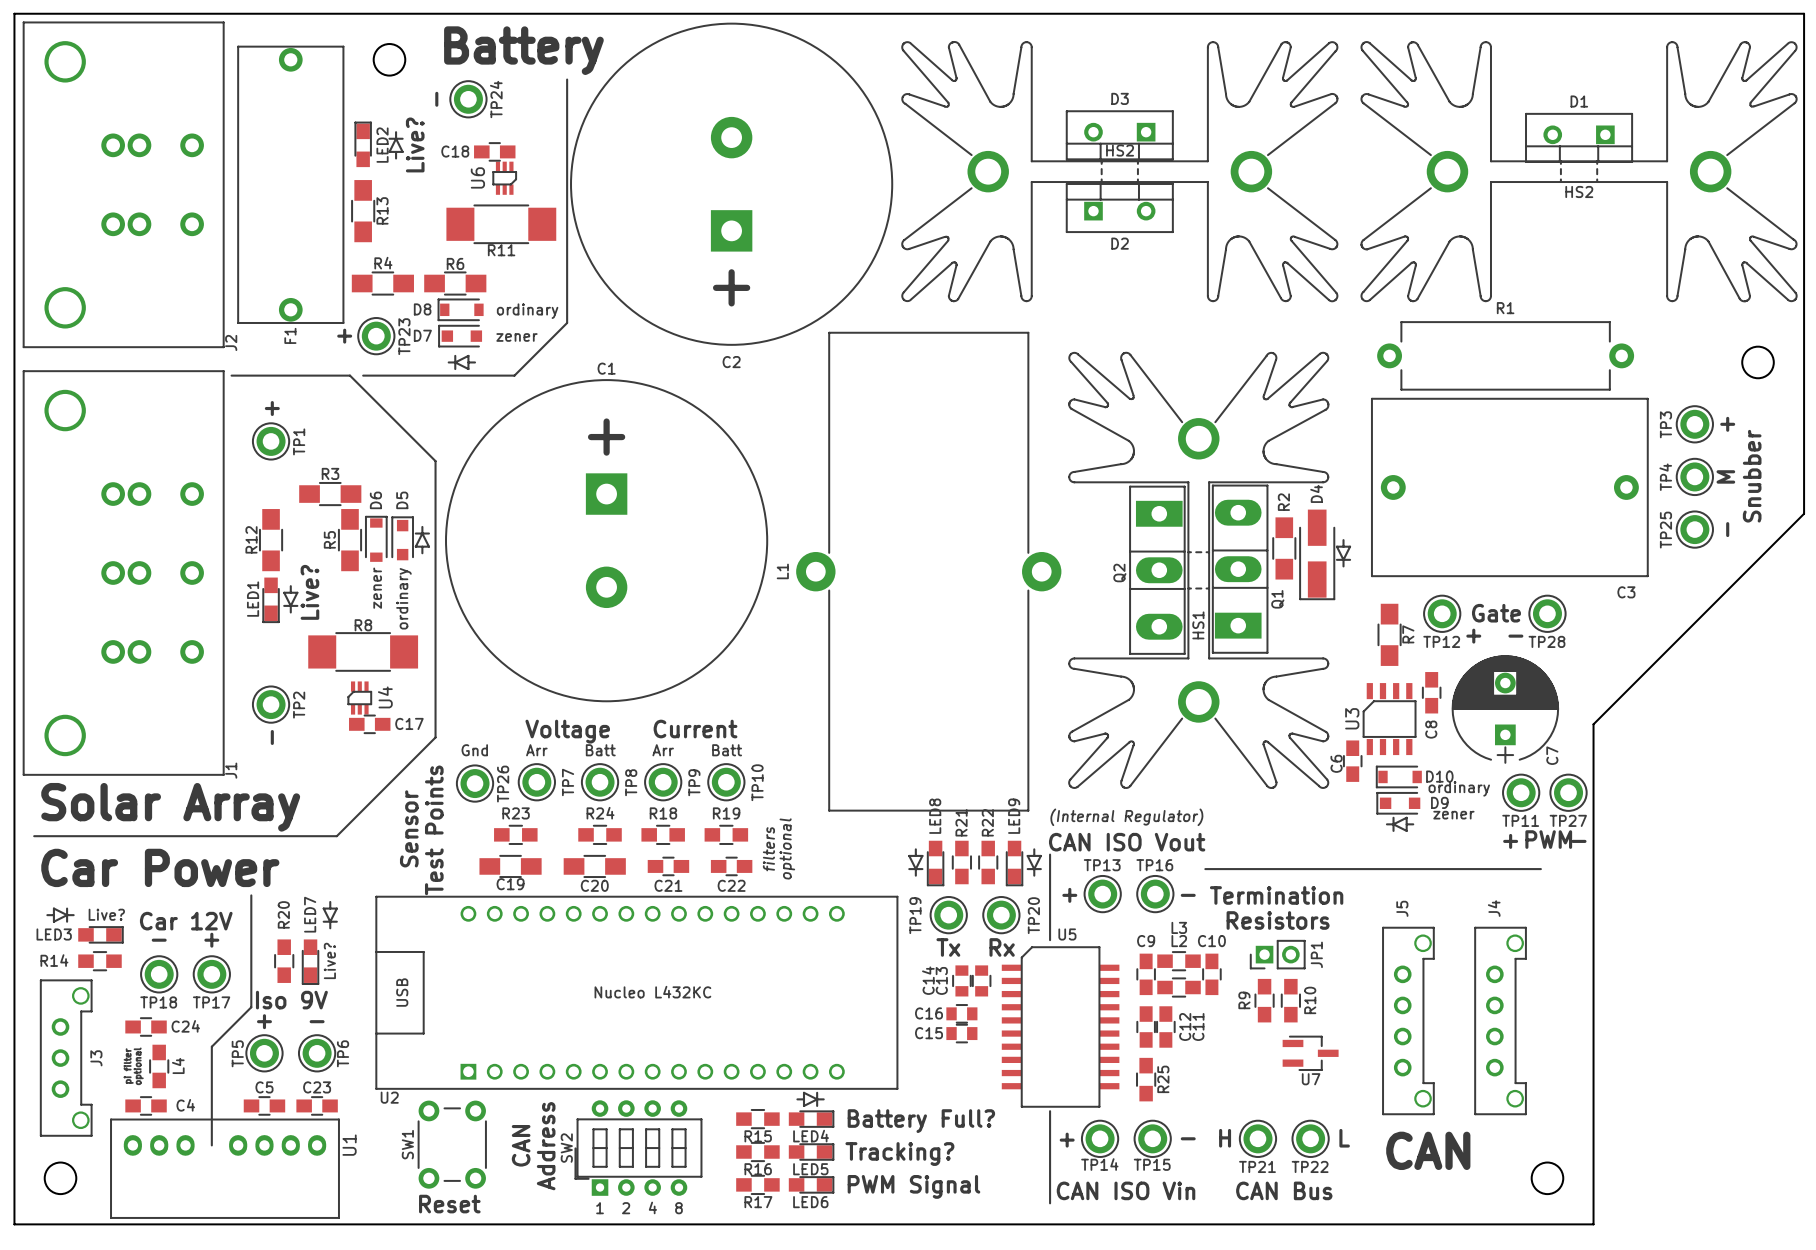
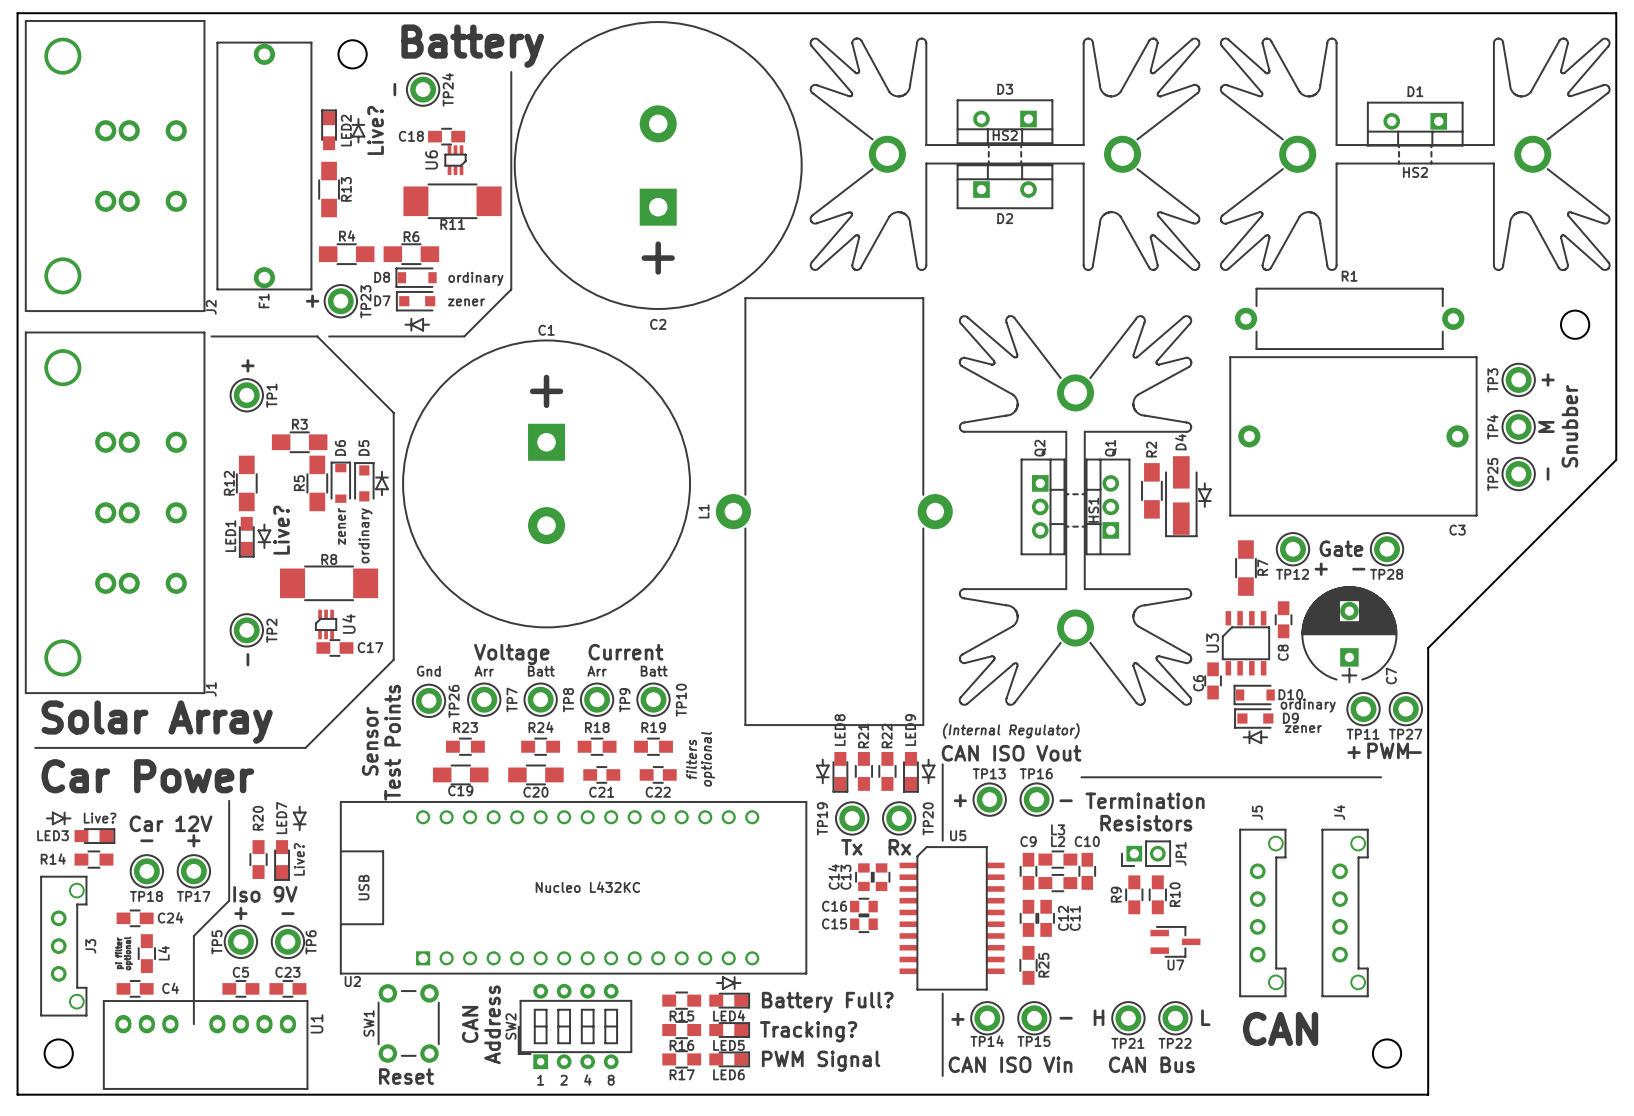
Q1 footprint: [1212, 484, 1269, 654] -> [1085, 458, 1131, 555]
Q2 footprint: [1129, 486, 1186, 655] -> [1020, 458, 1066, 555]
Q2 name position: Q2 (1119, 573) -> Q2 (1040, 448)
Q1 name position: Q1 (1277, 599) -> Q1 (1110, 448)
HS1 name position: HS1 (1198, 625) -> HS1 (1093, 510)

